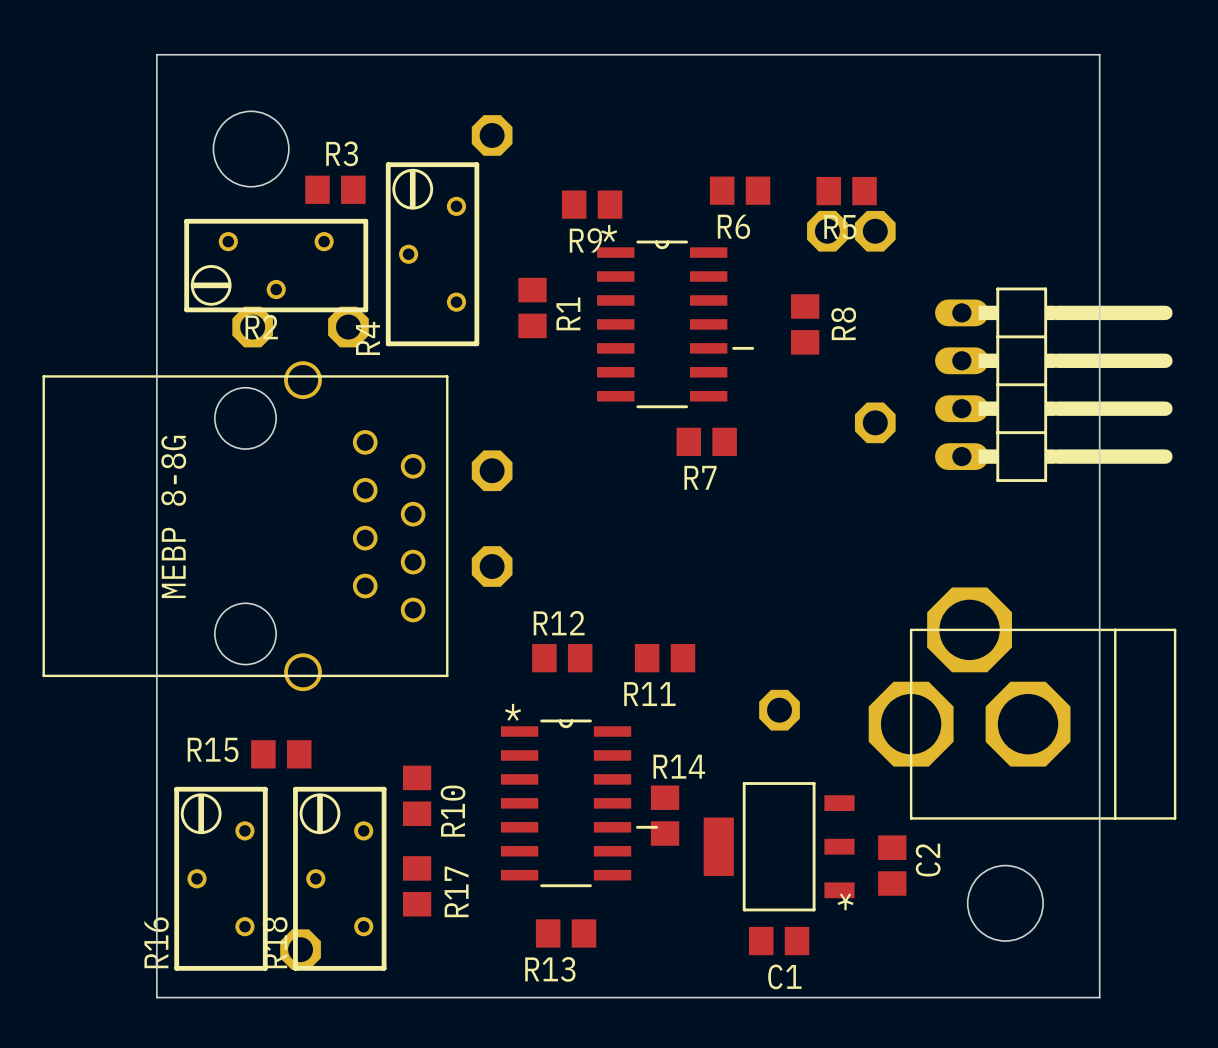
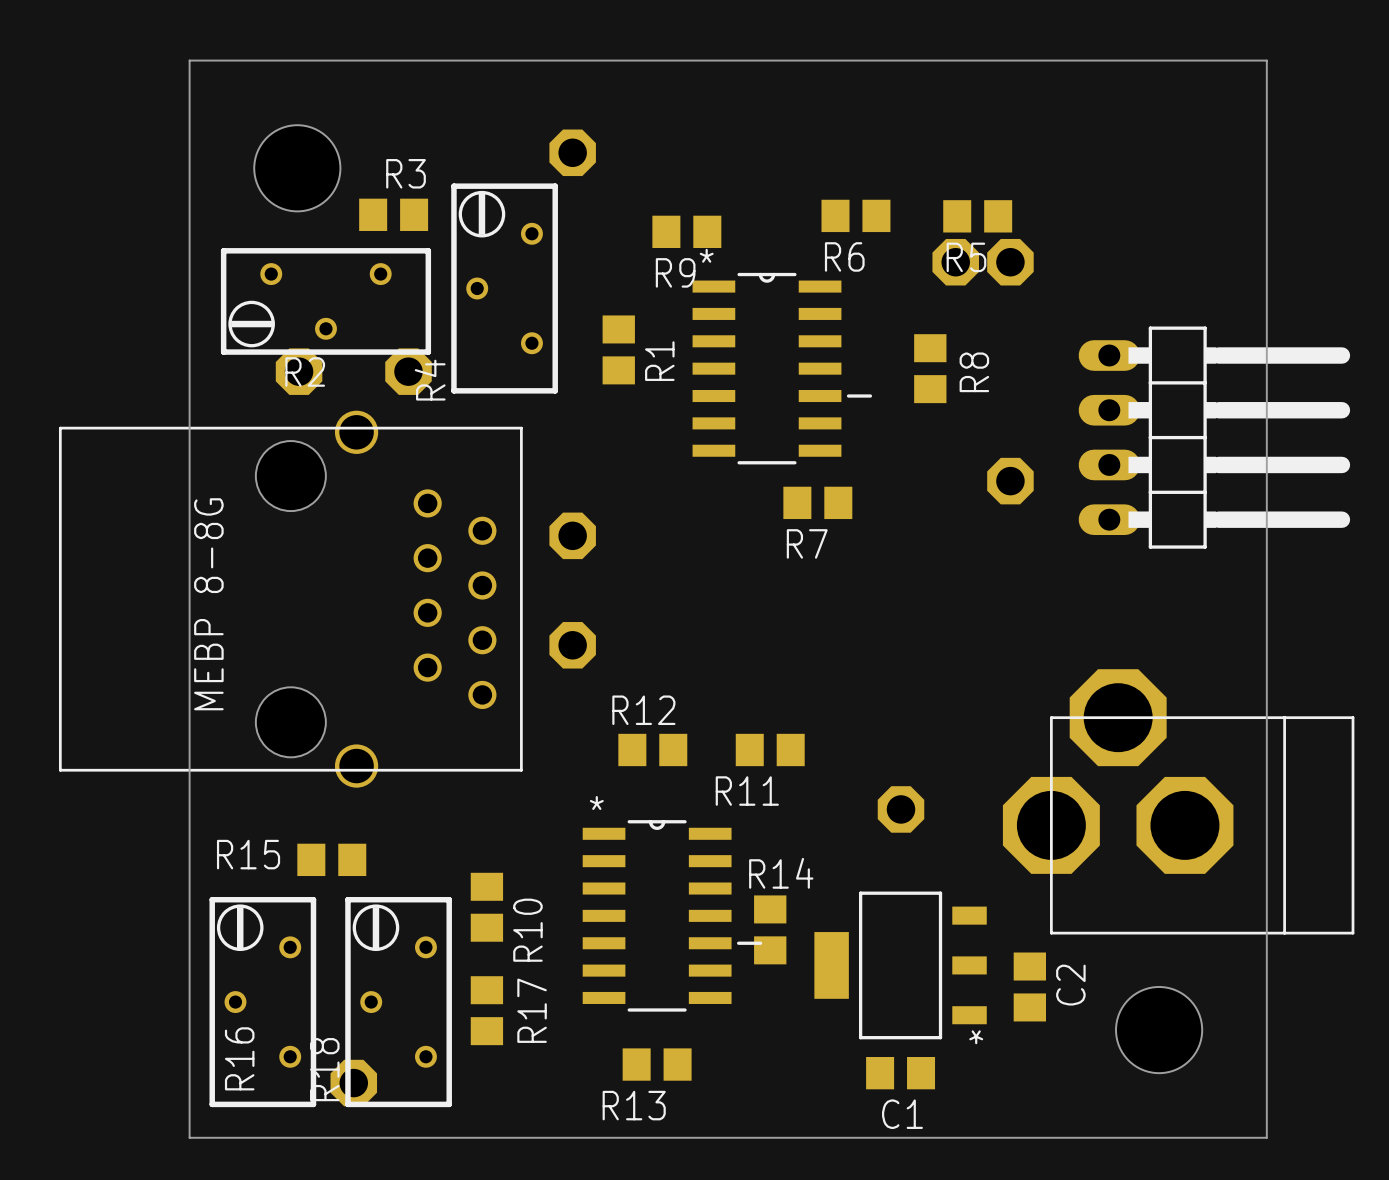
R16 name position: R16 (156, 942) -> R16 (239, 1058)

